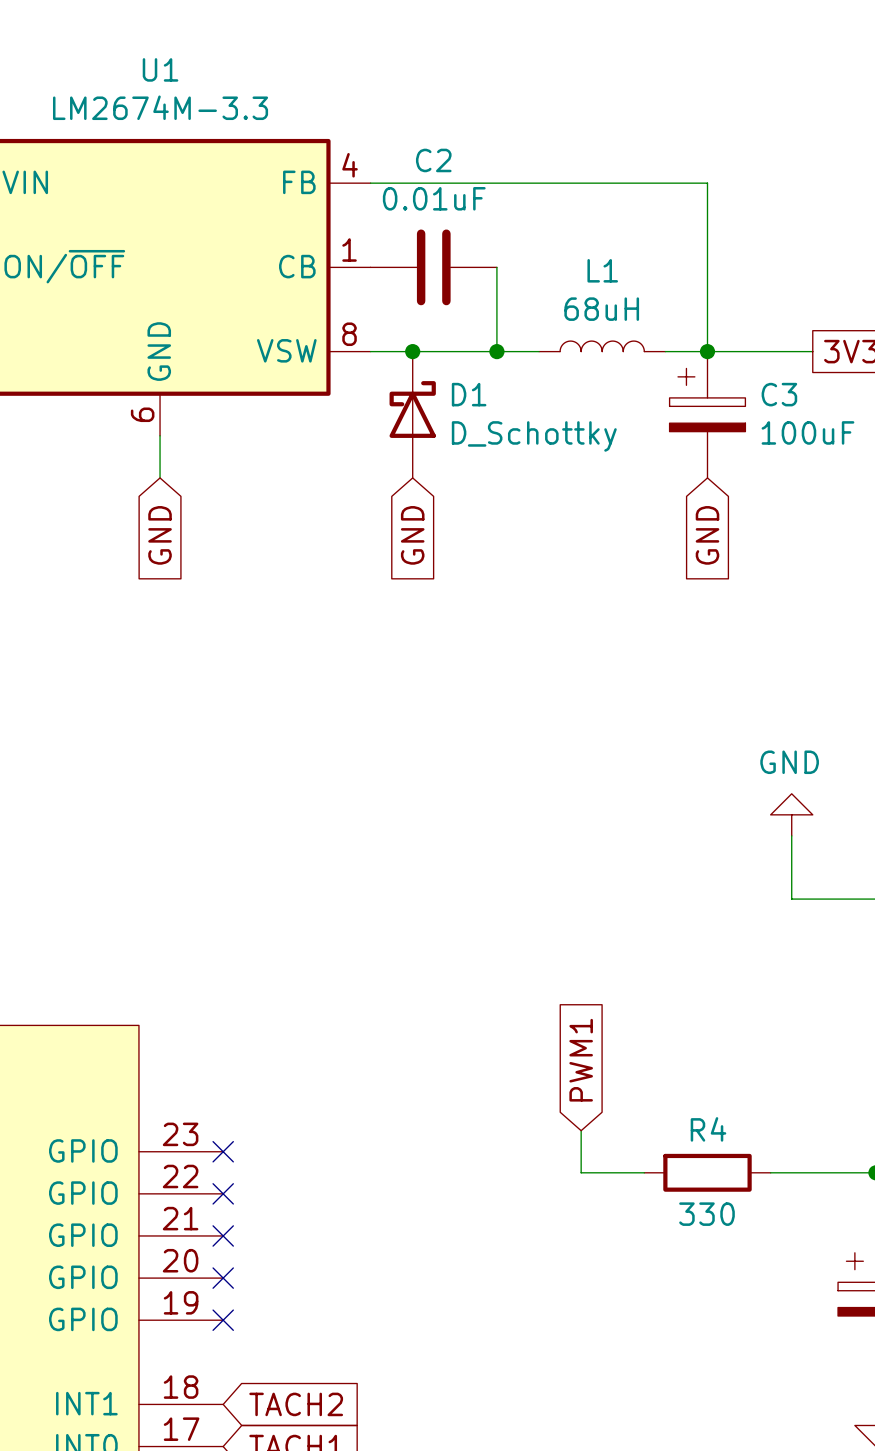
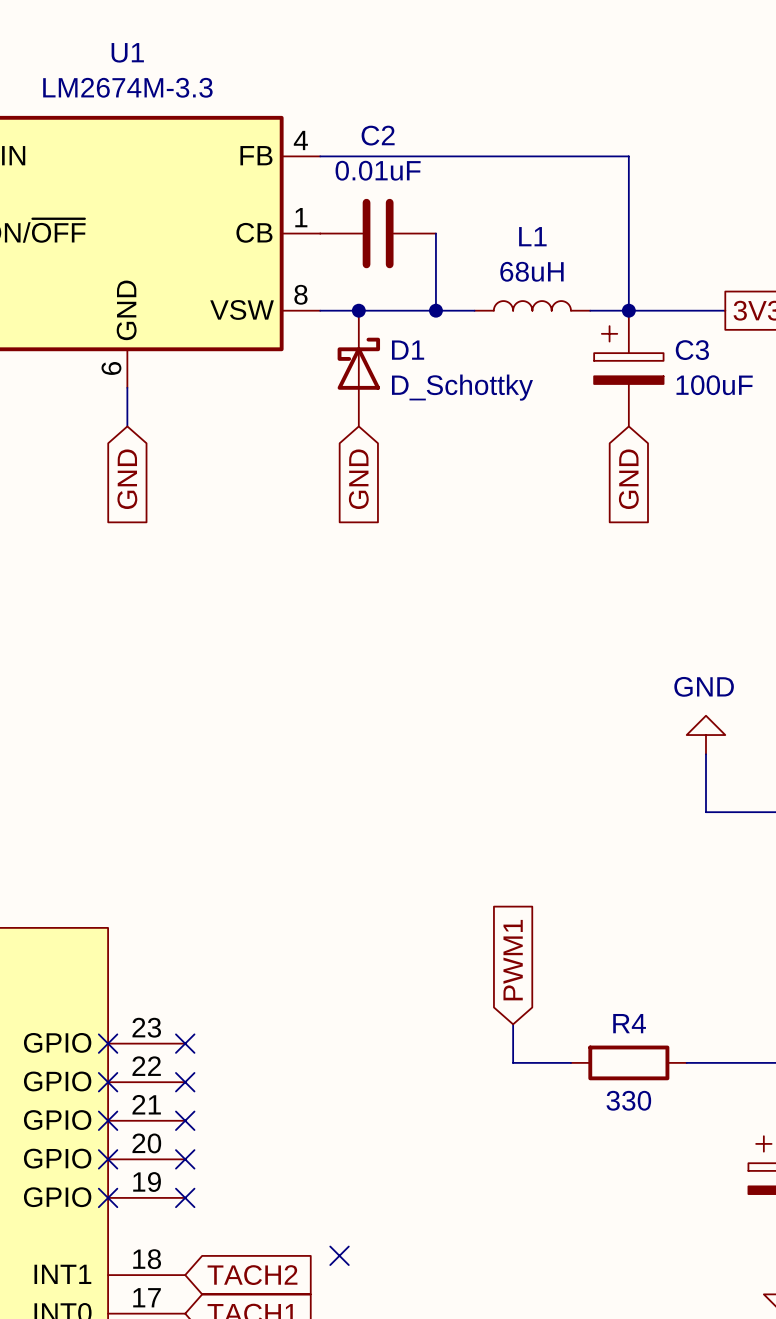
no-connect mark: none -> (108, 1043)
no-connect mark: none -> (108, 1082)
no-connect mark: none -> (108, 1120)
no-connect mark: none -> (108, 1159)
no-connect mark: none -> (108, 1197)
no-connect mark: none -> (339, 1255)

